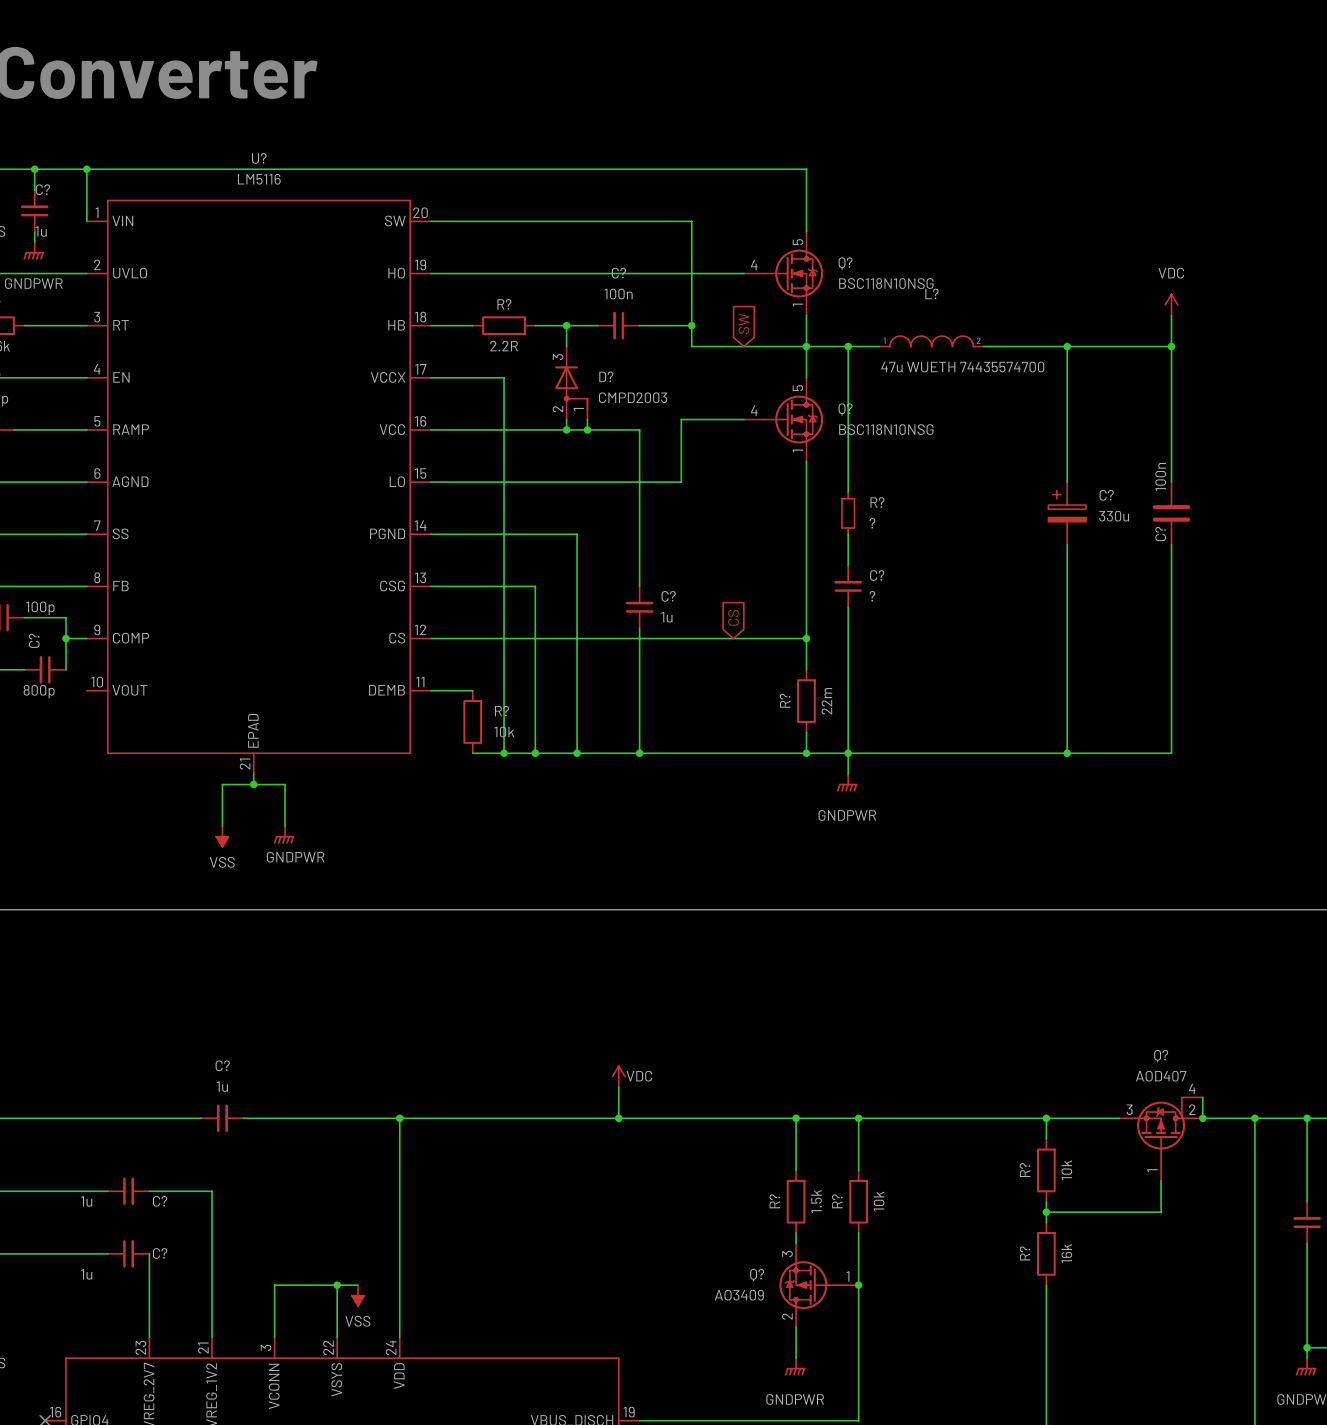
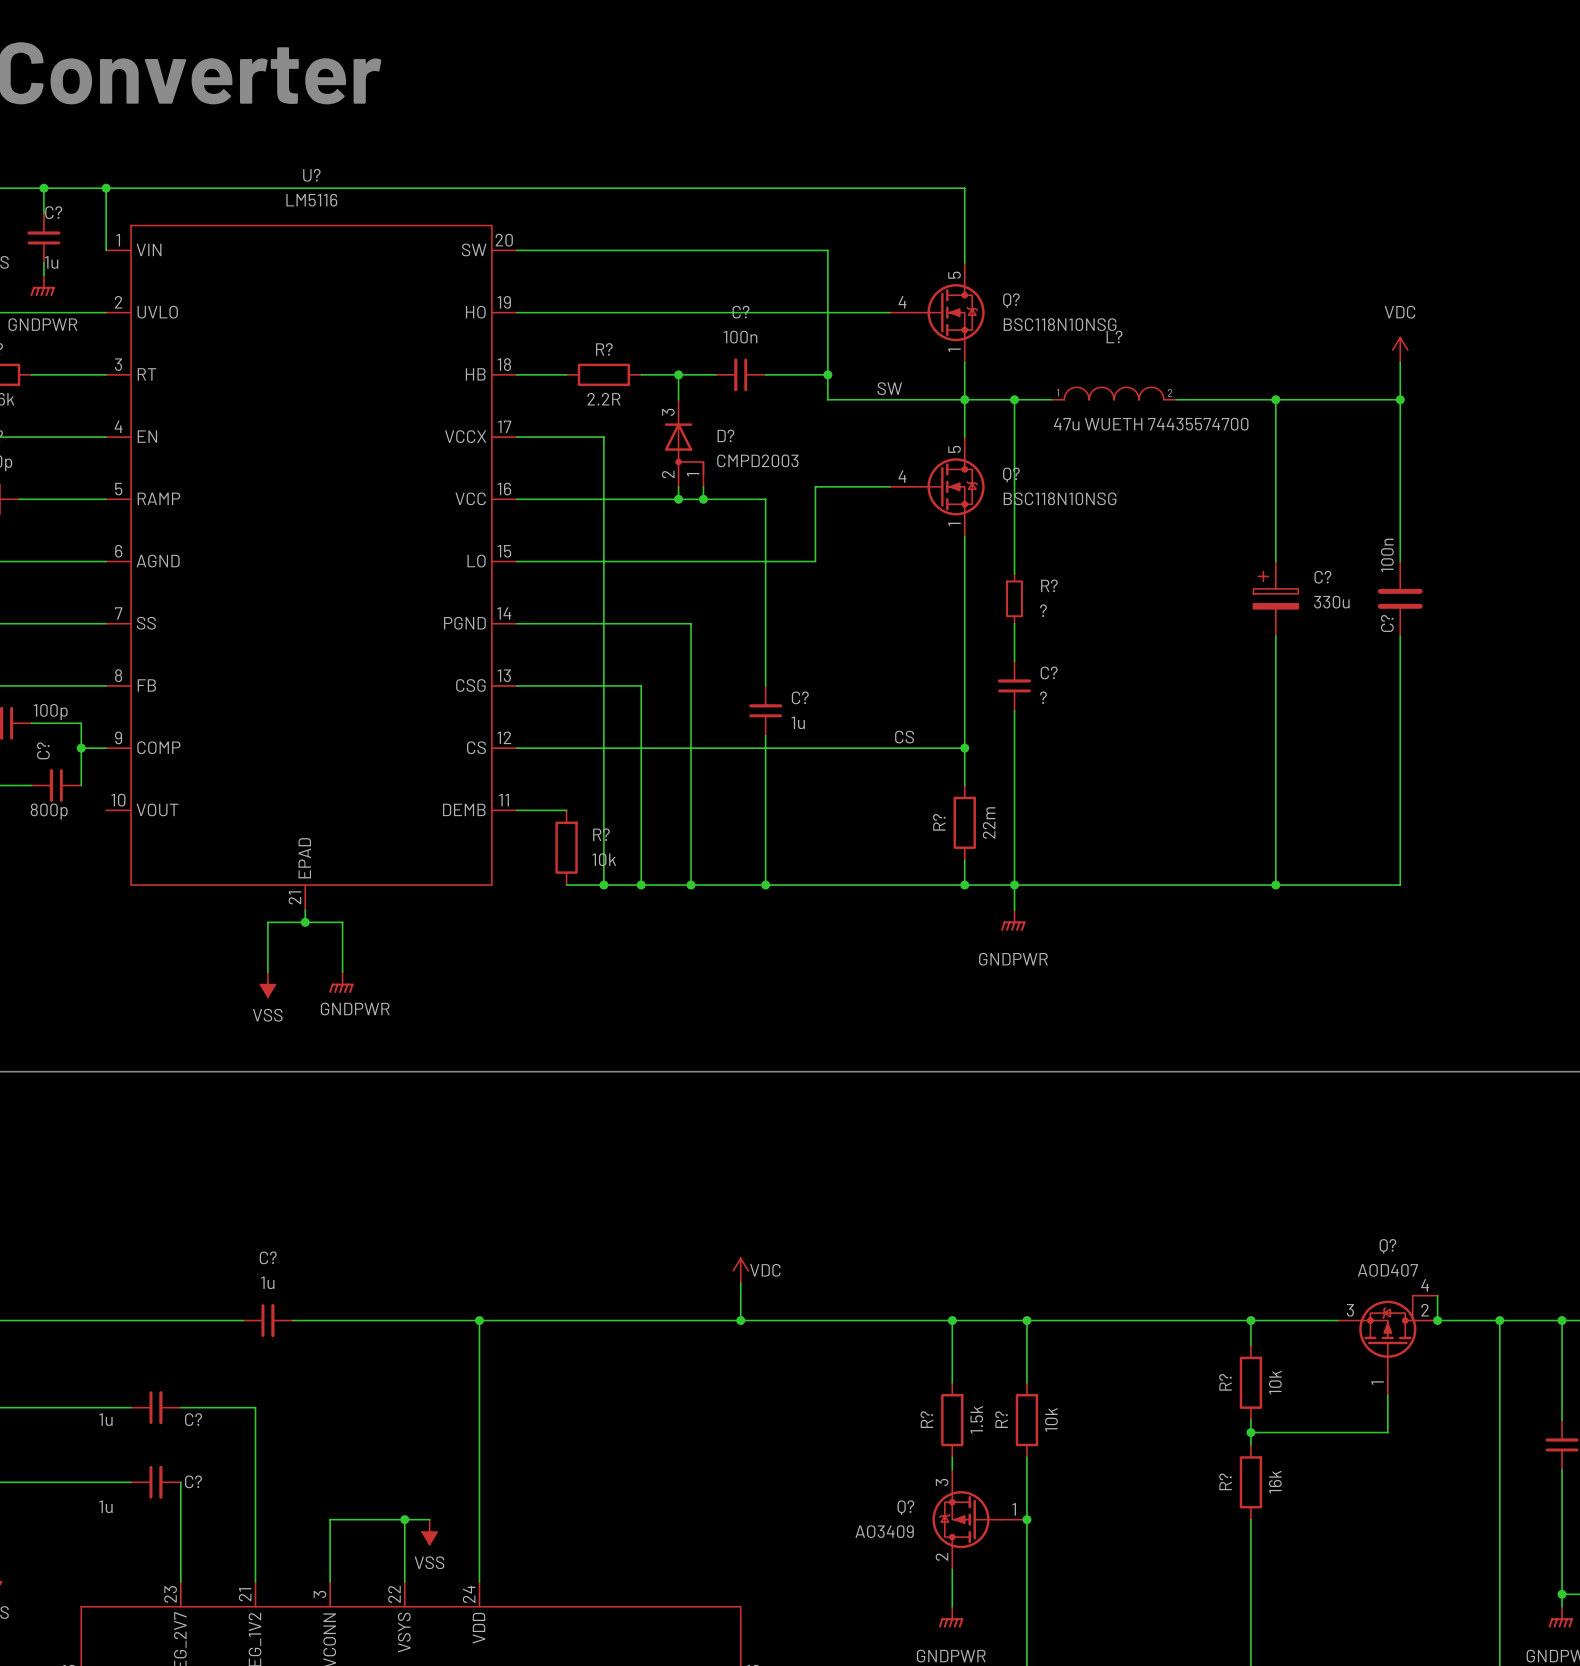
global label: SW (743, 323) -> none
label: none -> SW (889, 388)
global label: CS (733, 617) -> none
label: none -> CS (904, 737)

